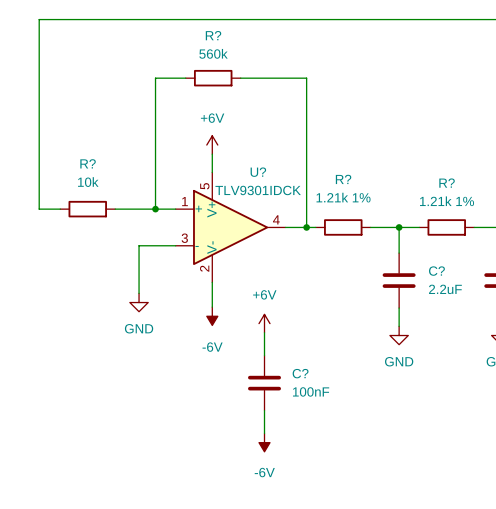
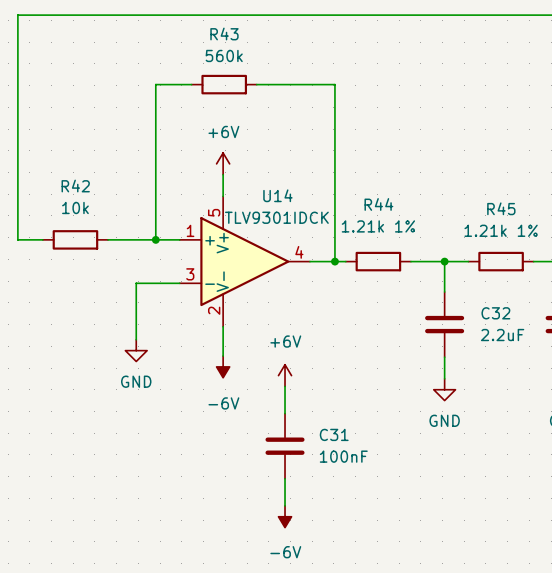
R? name: R? (213, 35) -> R43 (224, 33)
R? name: R? (88, 163) -> R42 (75, 186)
U? name: U? (258, 172) -> U14 (277, 195)
R? name: R? (343, 179) -> R44 (378, 204)
R? name: R? (447, 183) -> R45 (501, 208)
C? name: C? (436, 271) -> C32 (495, 313)
C? name: C? (300, 373) -> C31 (334, 434)

